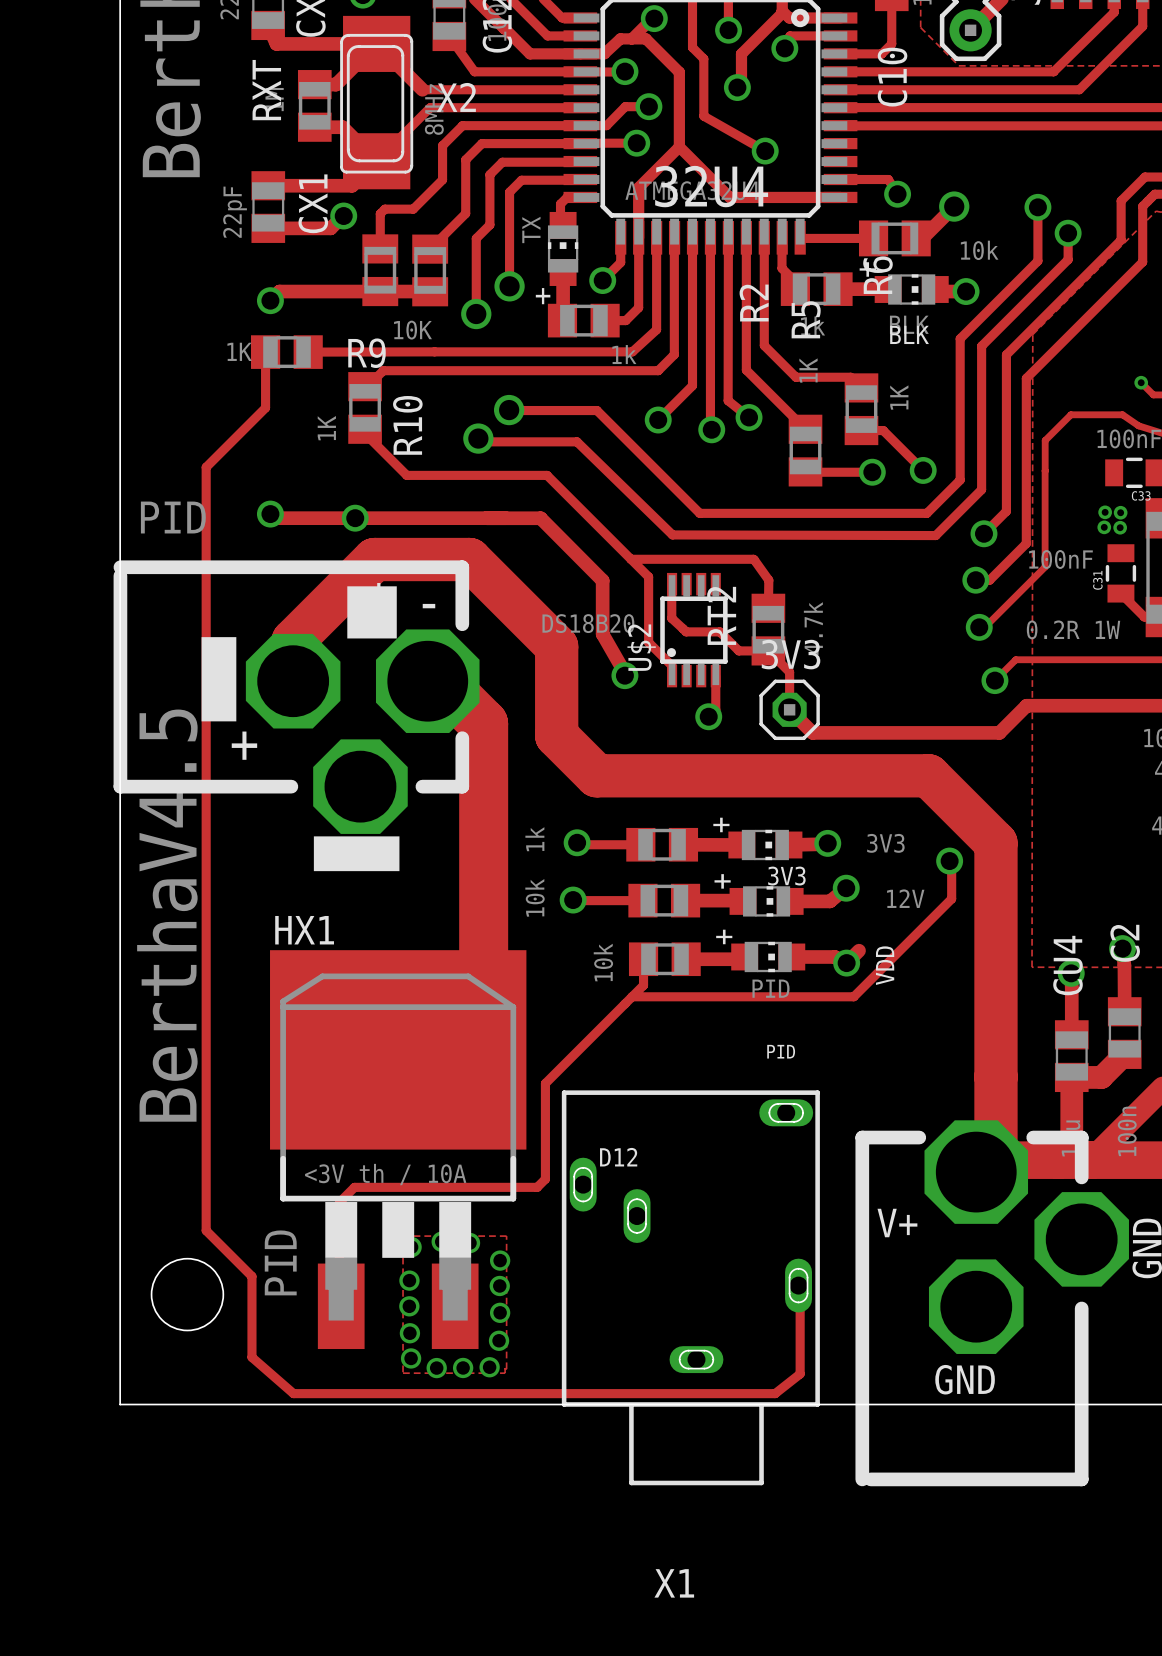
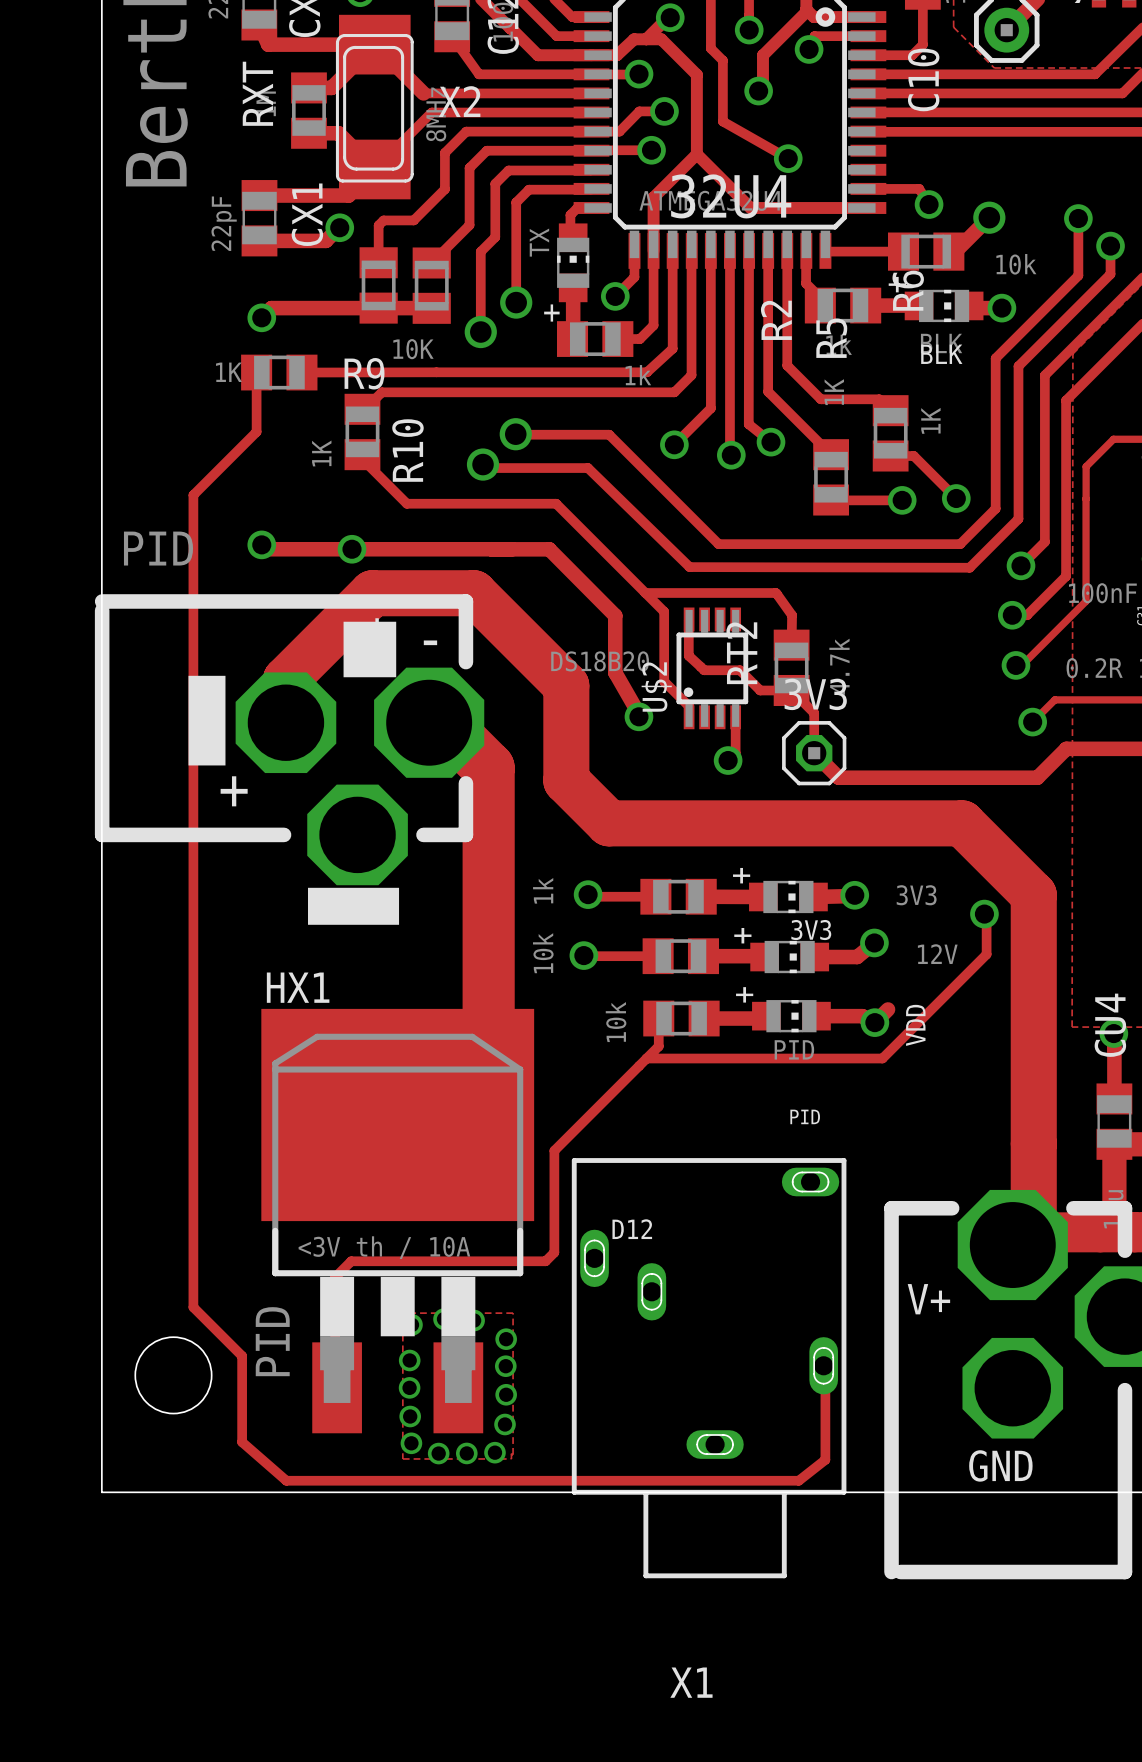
text: BerthaV4.5 (167, 915) -> none

